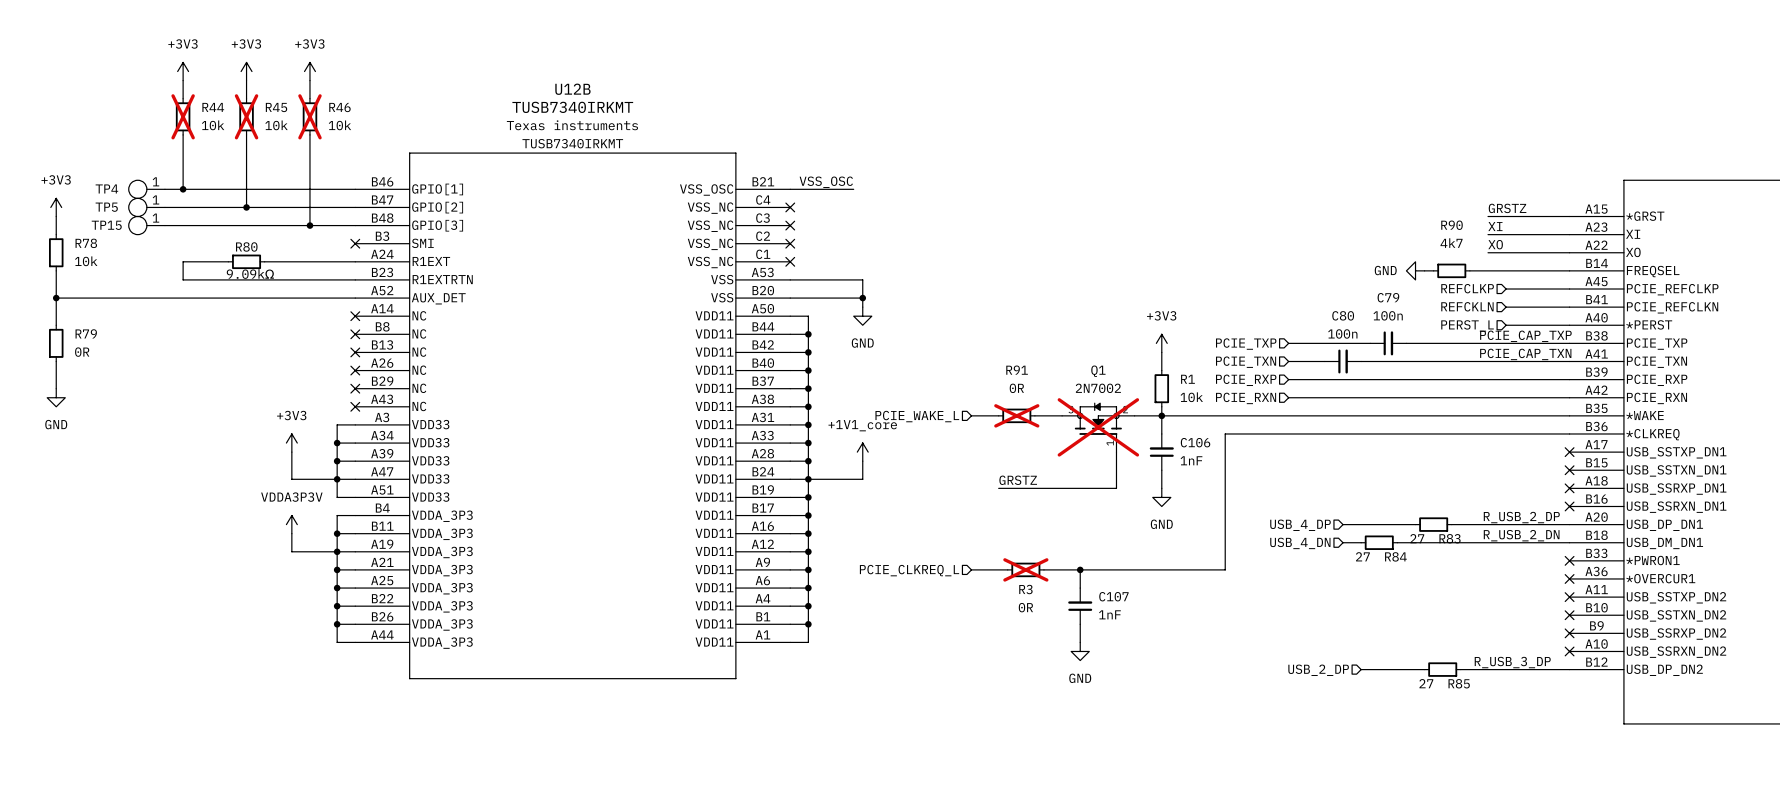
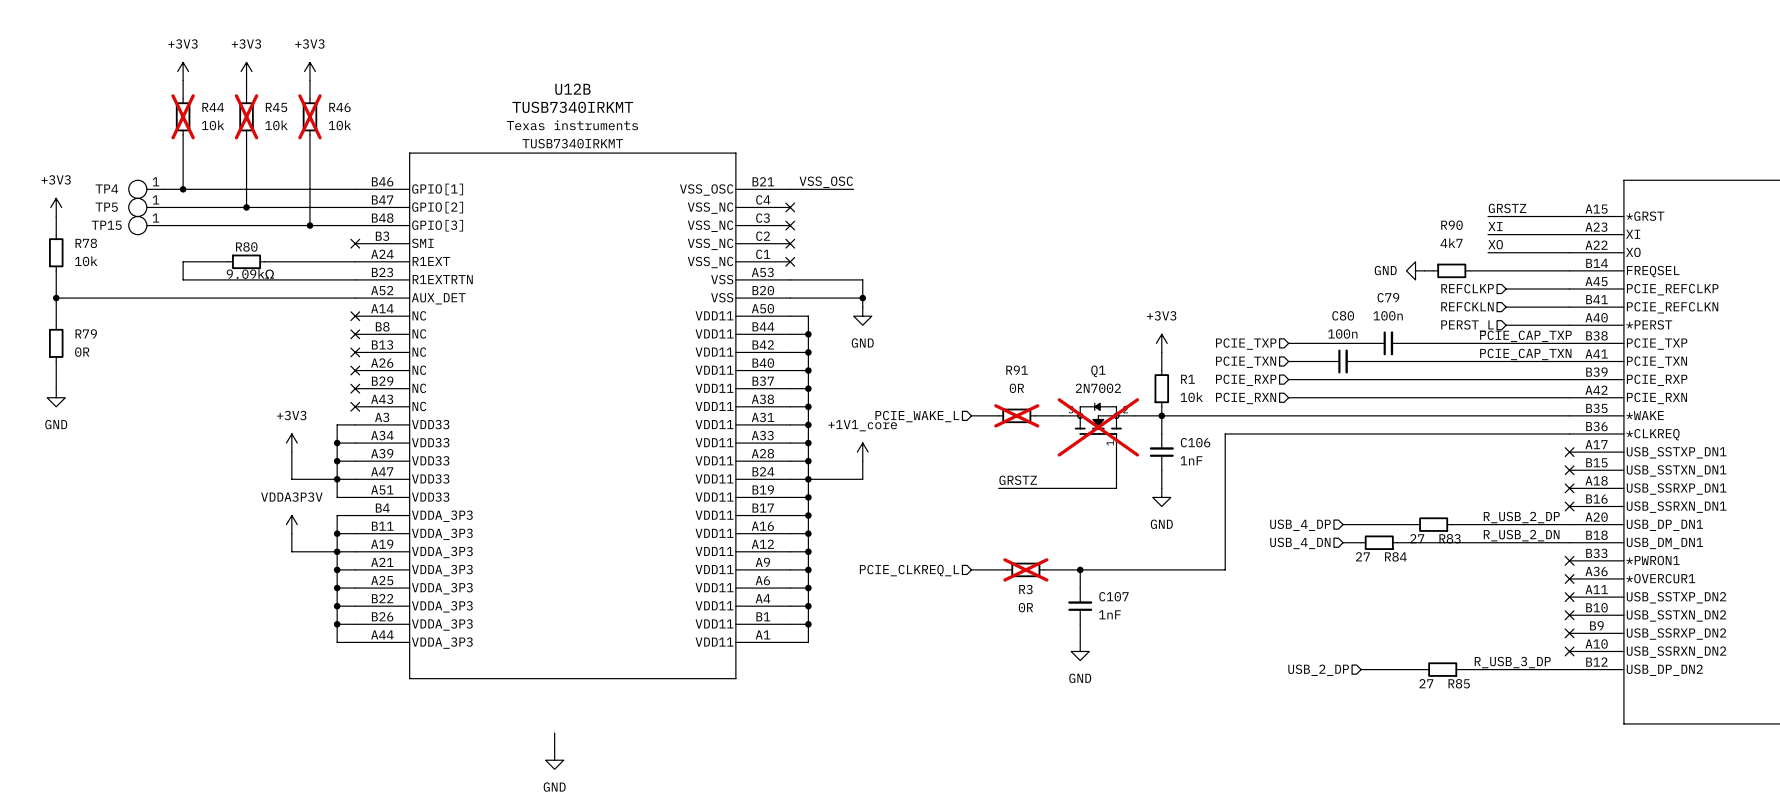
wire: none -> (554, 733) (554, 751)
power symbol: none -> GND (554, 760)

